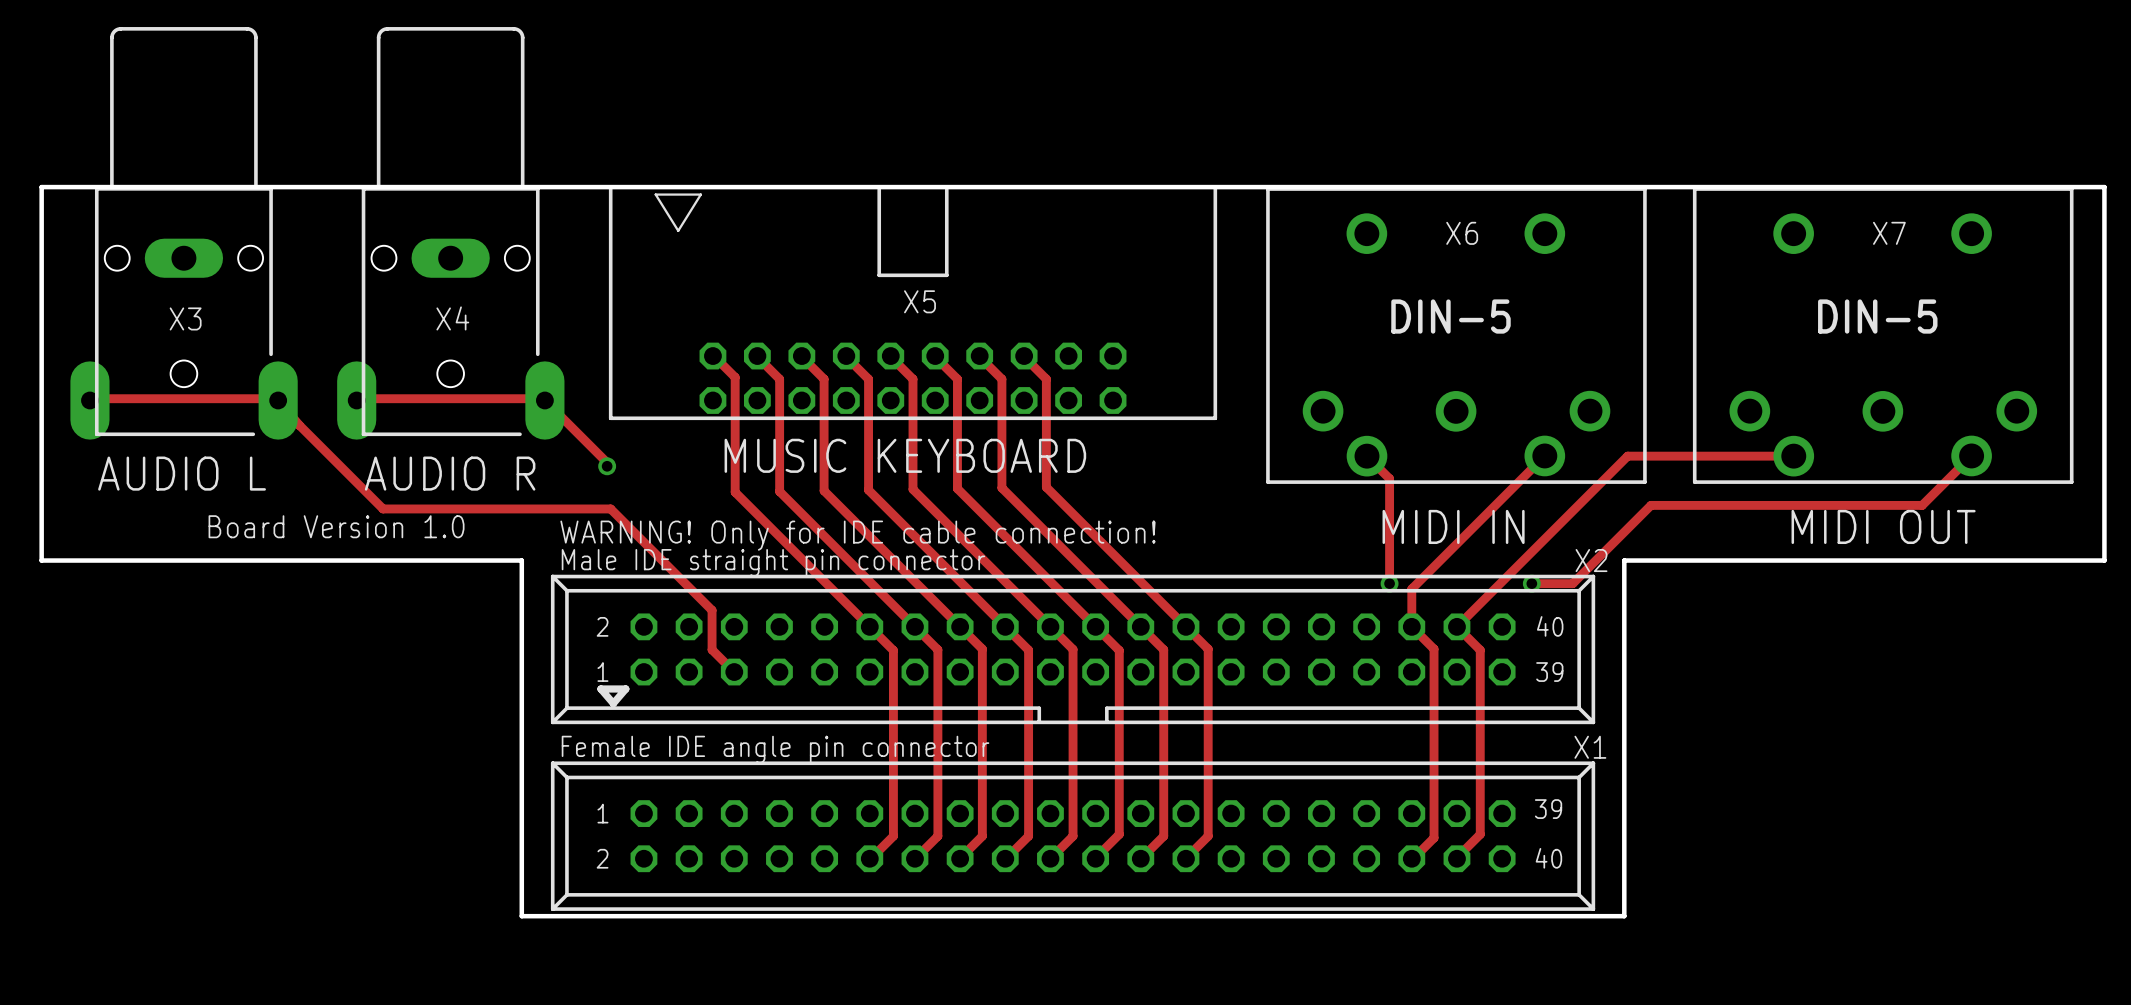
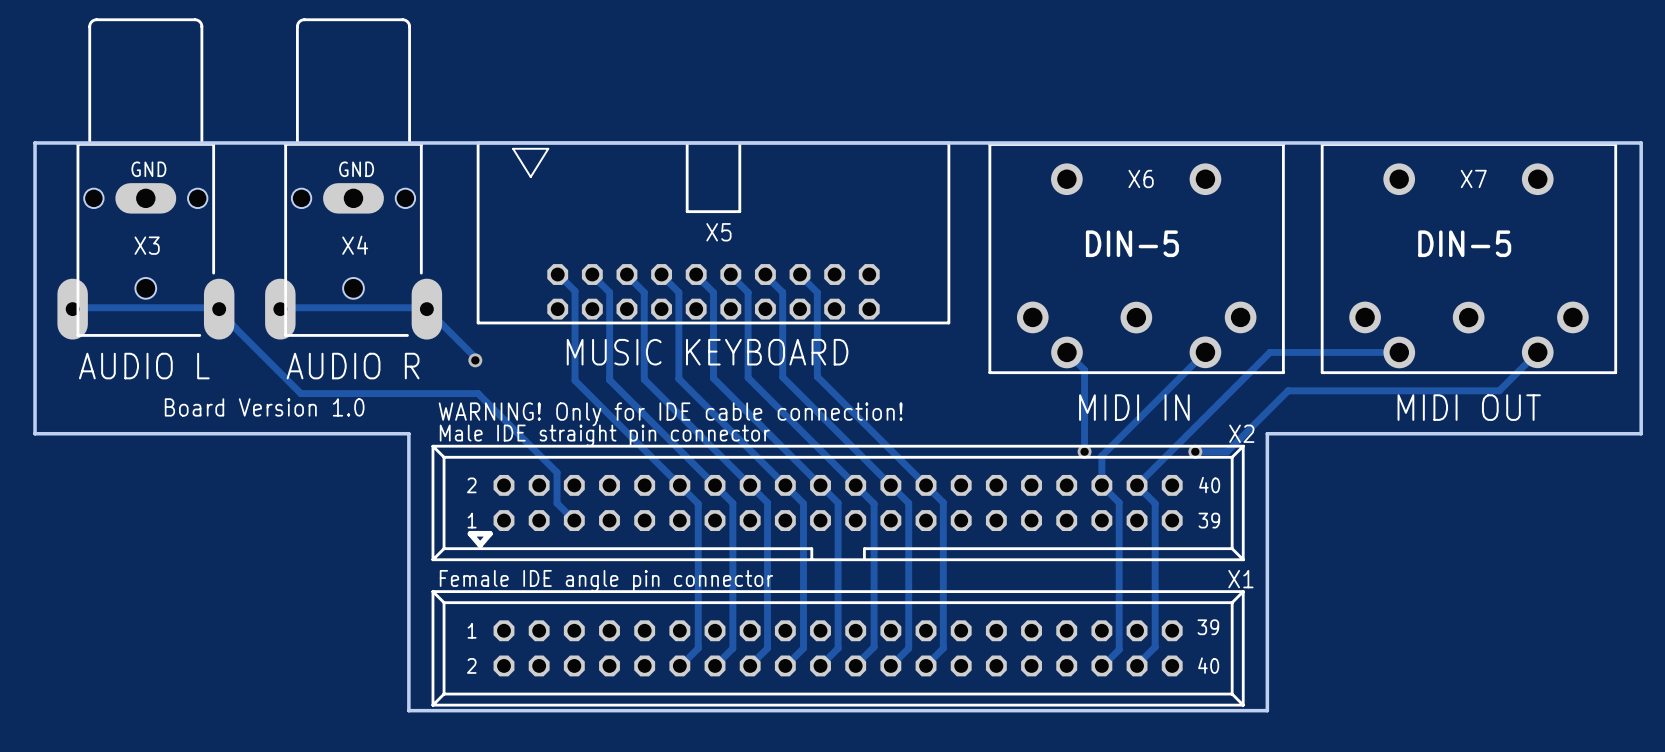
text: none -> GND (148, 169)
text: none -> GND (356, 169)

